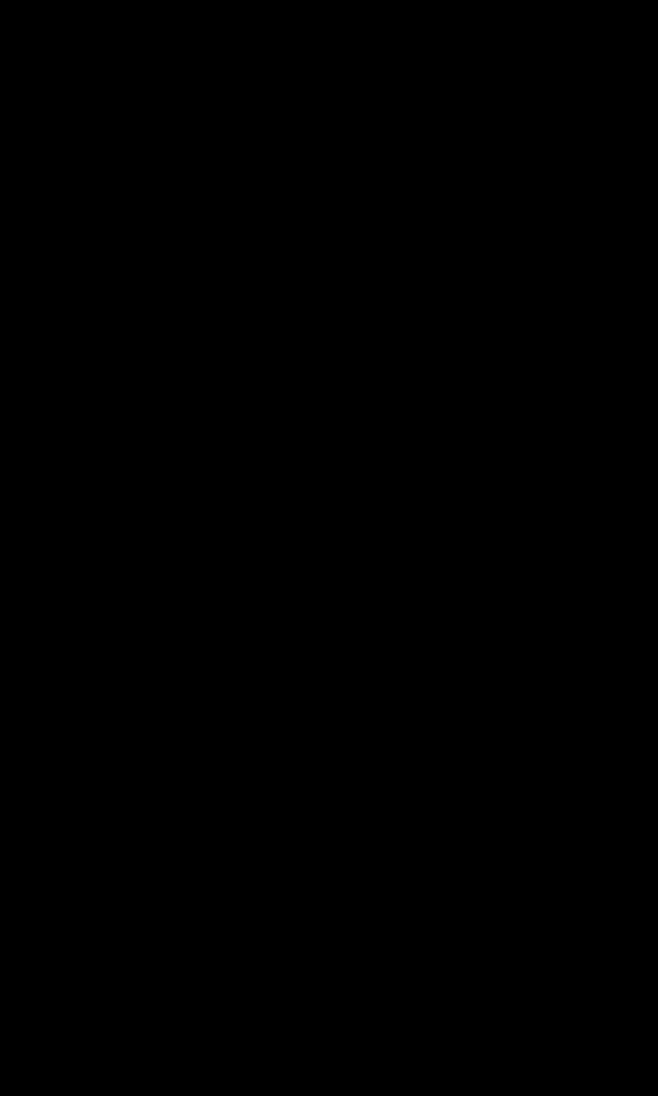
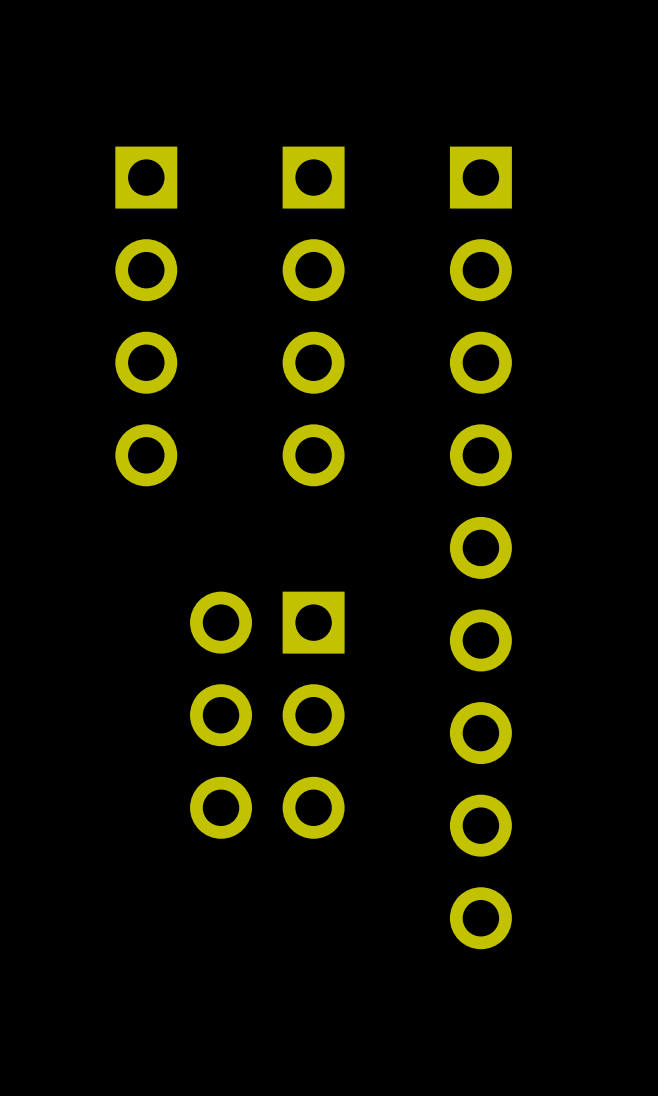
part: none -> (146, 316)
part: none -> (313, 316)
part: none -> (480, 547)
part: none -> (267, 715)

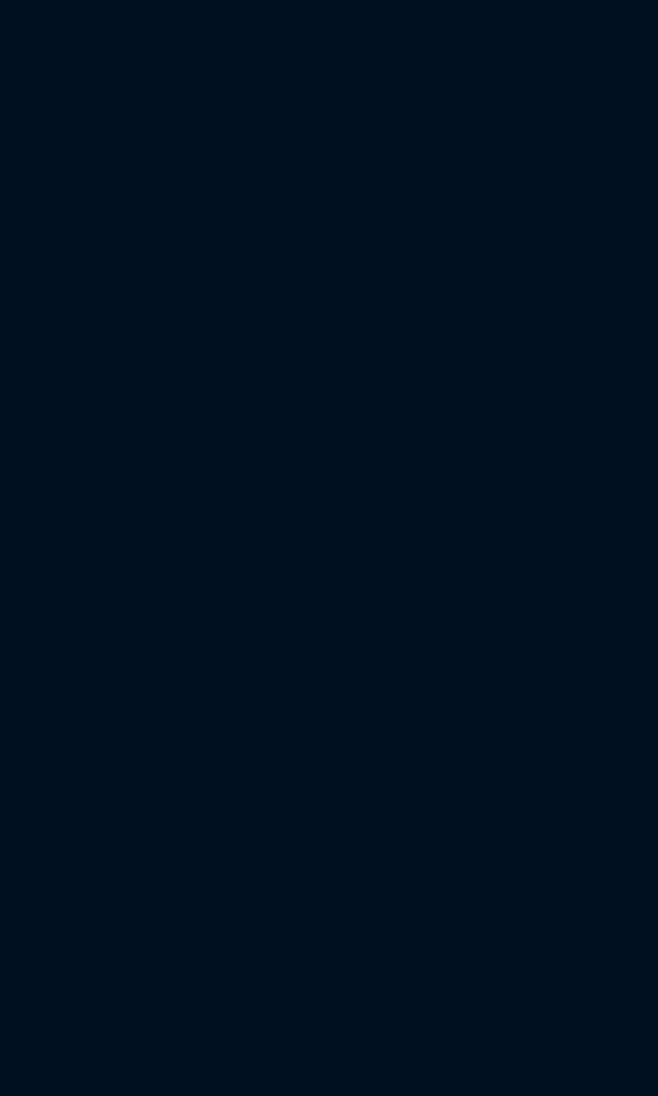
part: (146, 316) -> none
part: (313, 316) -> none
part: (480, 547) -> none
part: (267, 715) -> none

